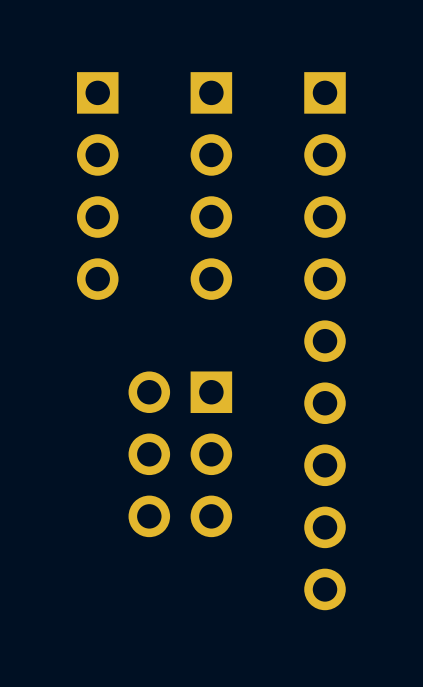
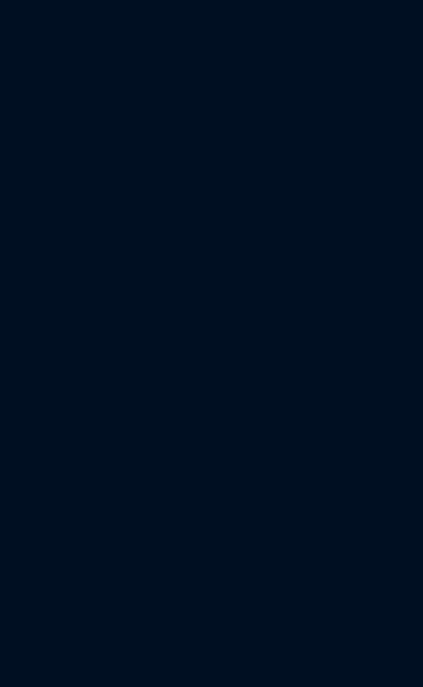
part: (97, 185) -> none
part: (211, 185) -> none
part: (325, 341) -> none
part: (180, 454) -> none

